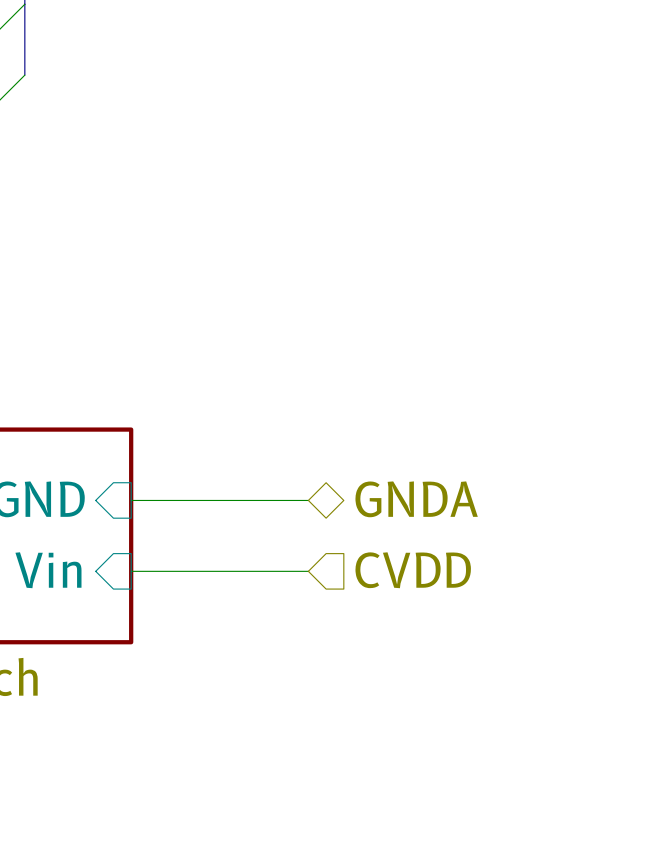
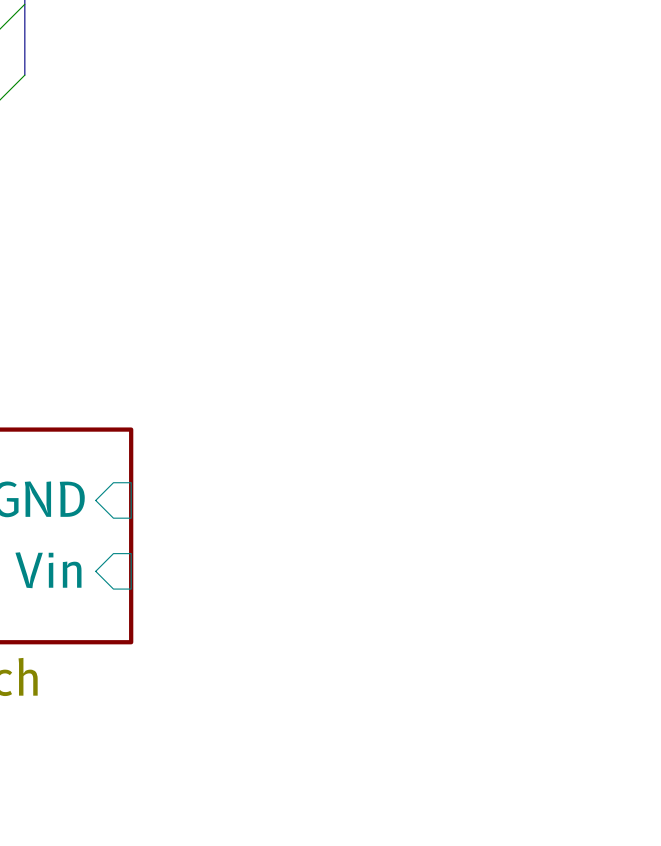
hierarchical label: GNDA (416, 499) -> none
wire: (131, 500) (308, 500) -> none
hierarchical label: CVDD (413, 570) -> none
wire: (131, 571) (308, 571) -> none

